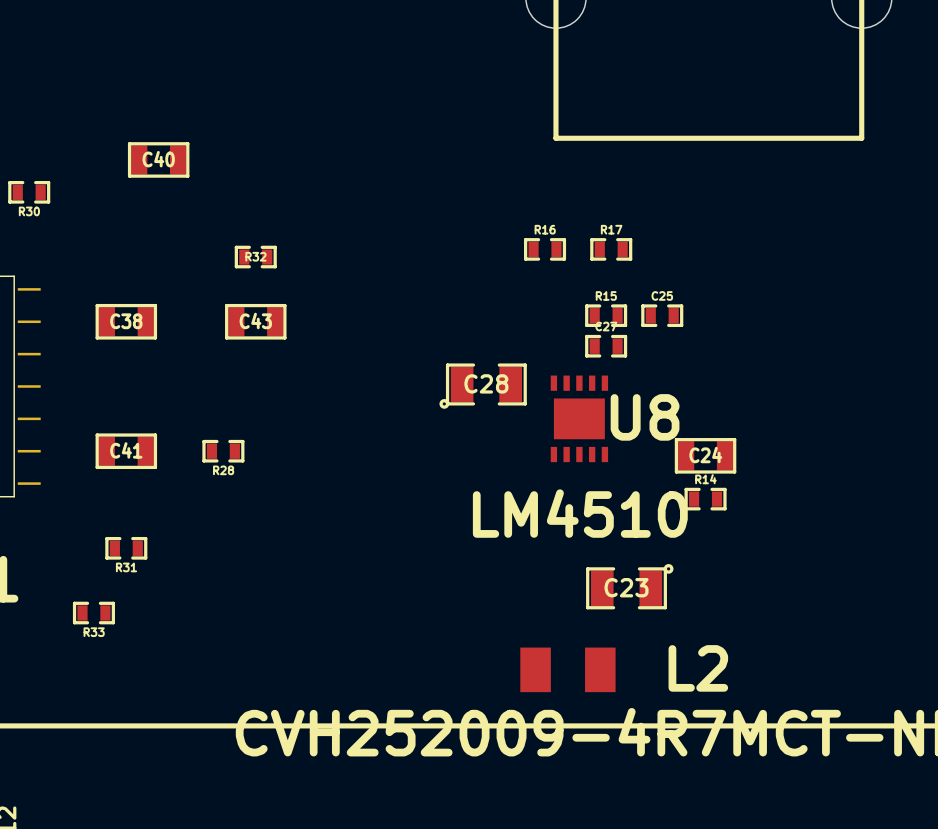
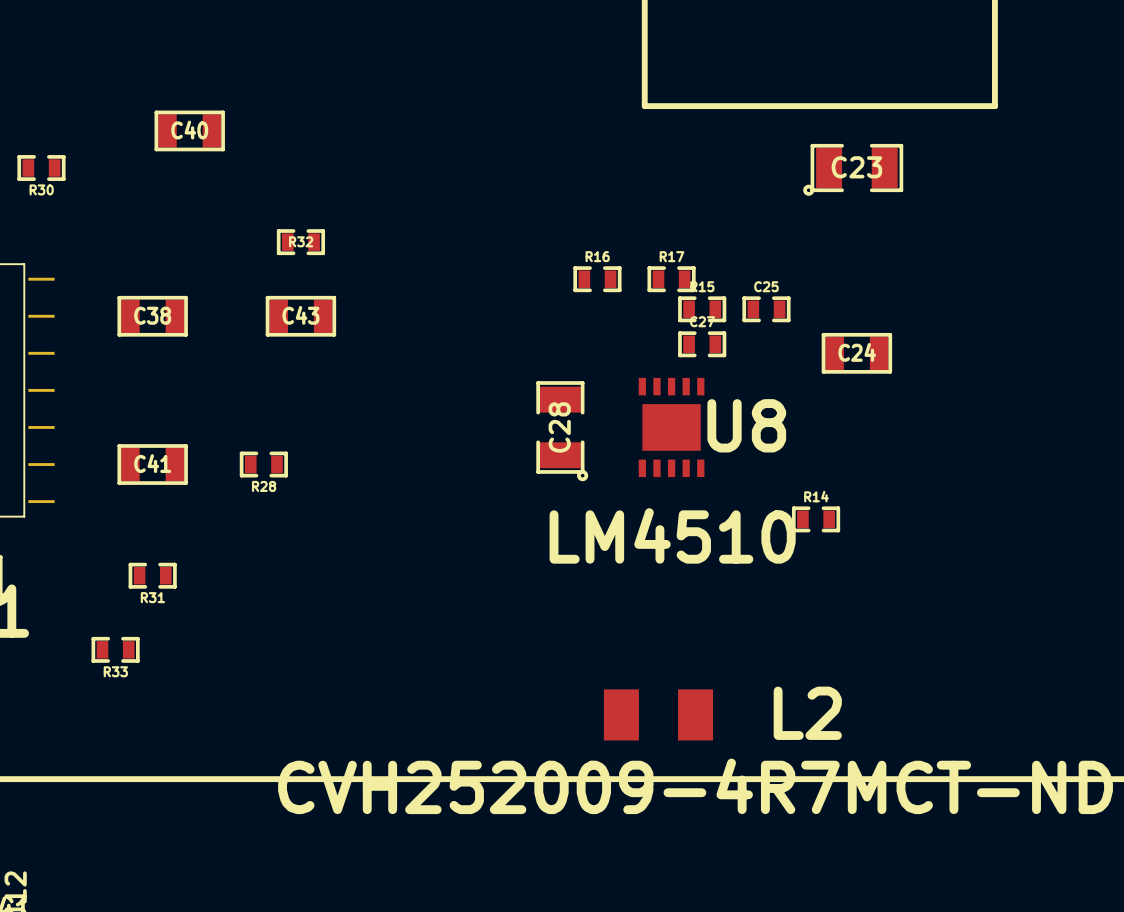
R16 position: (545, 249) -> (597, 279)
R17 position: (611, 249) -> (671, 279)
C28 rotation: 0° (483, 386) -> 90° counterclockwise (562, 431)
C24 position: (705, 455) -> (856, 353)
C23 rotation: 0° (629, 586) -> 180° (853, 169)
C23 position: (629, 586) -> (853, 169)

